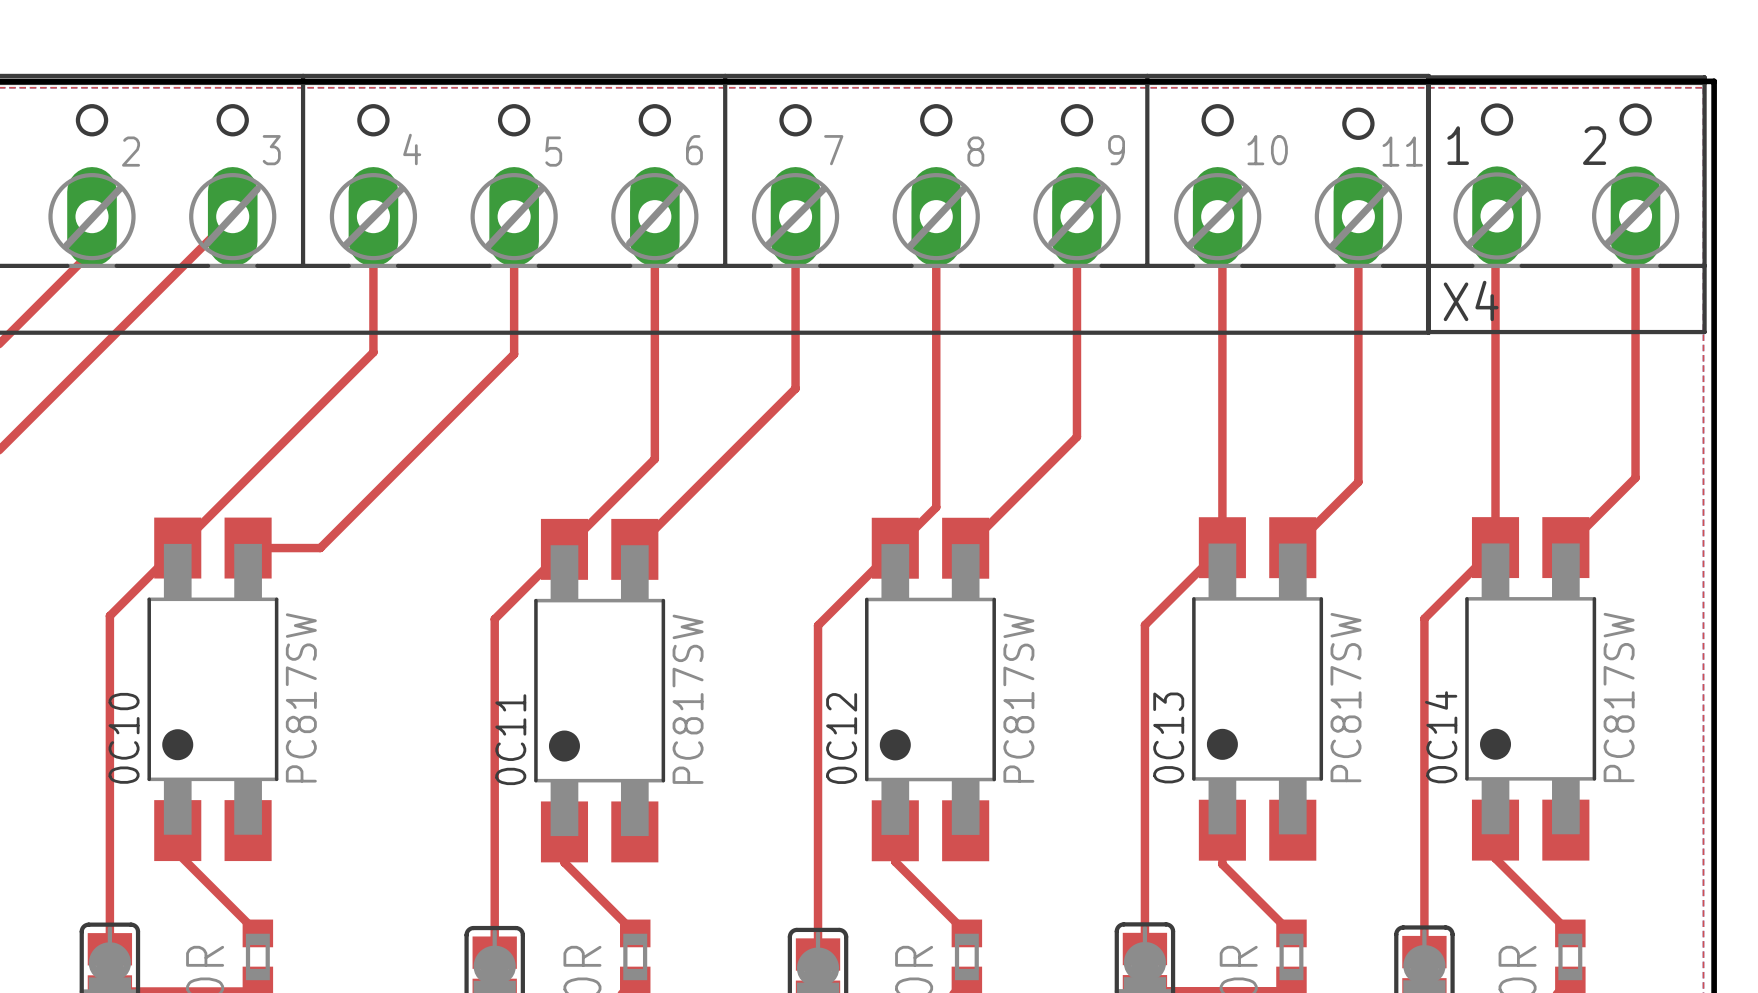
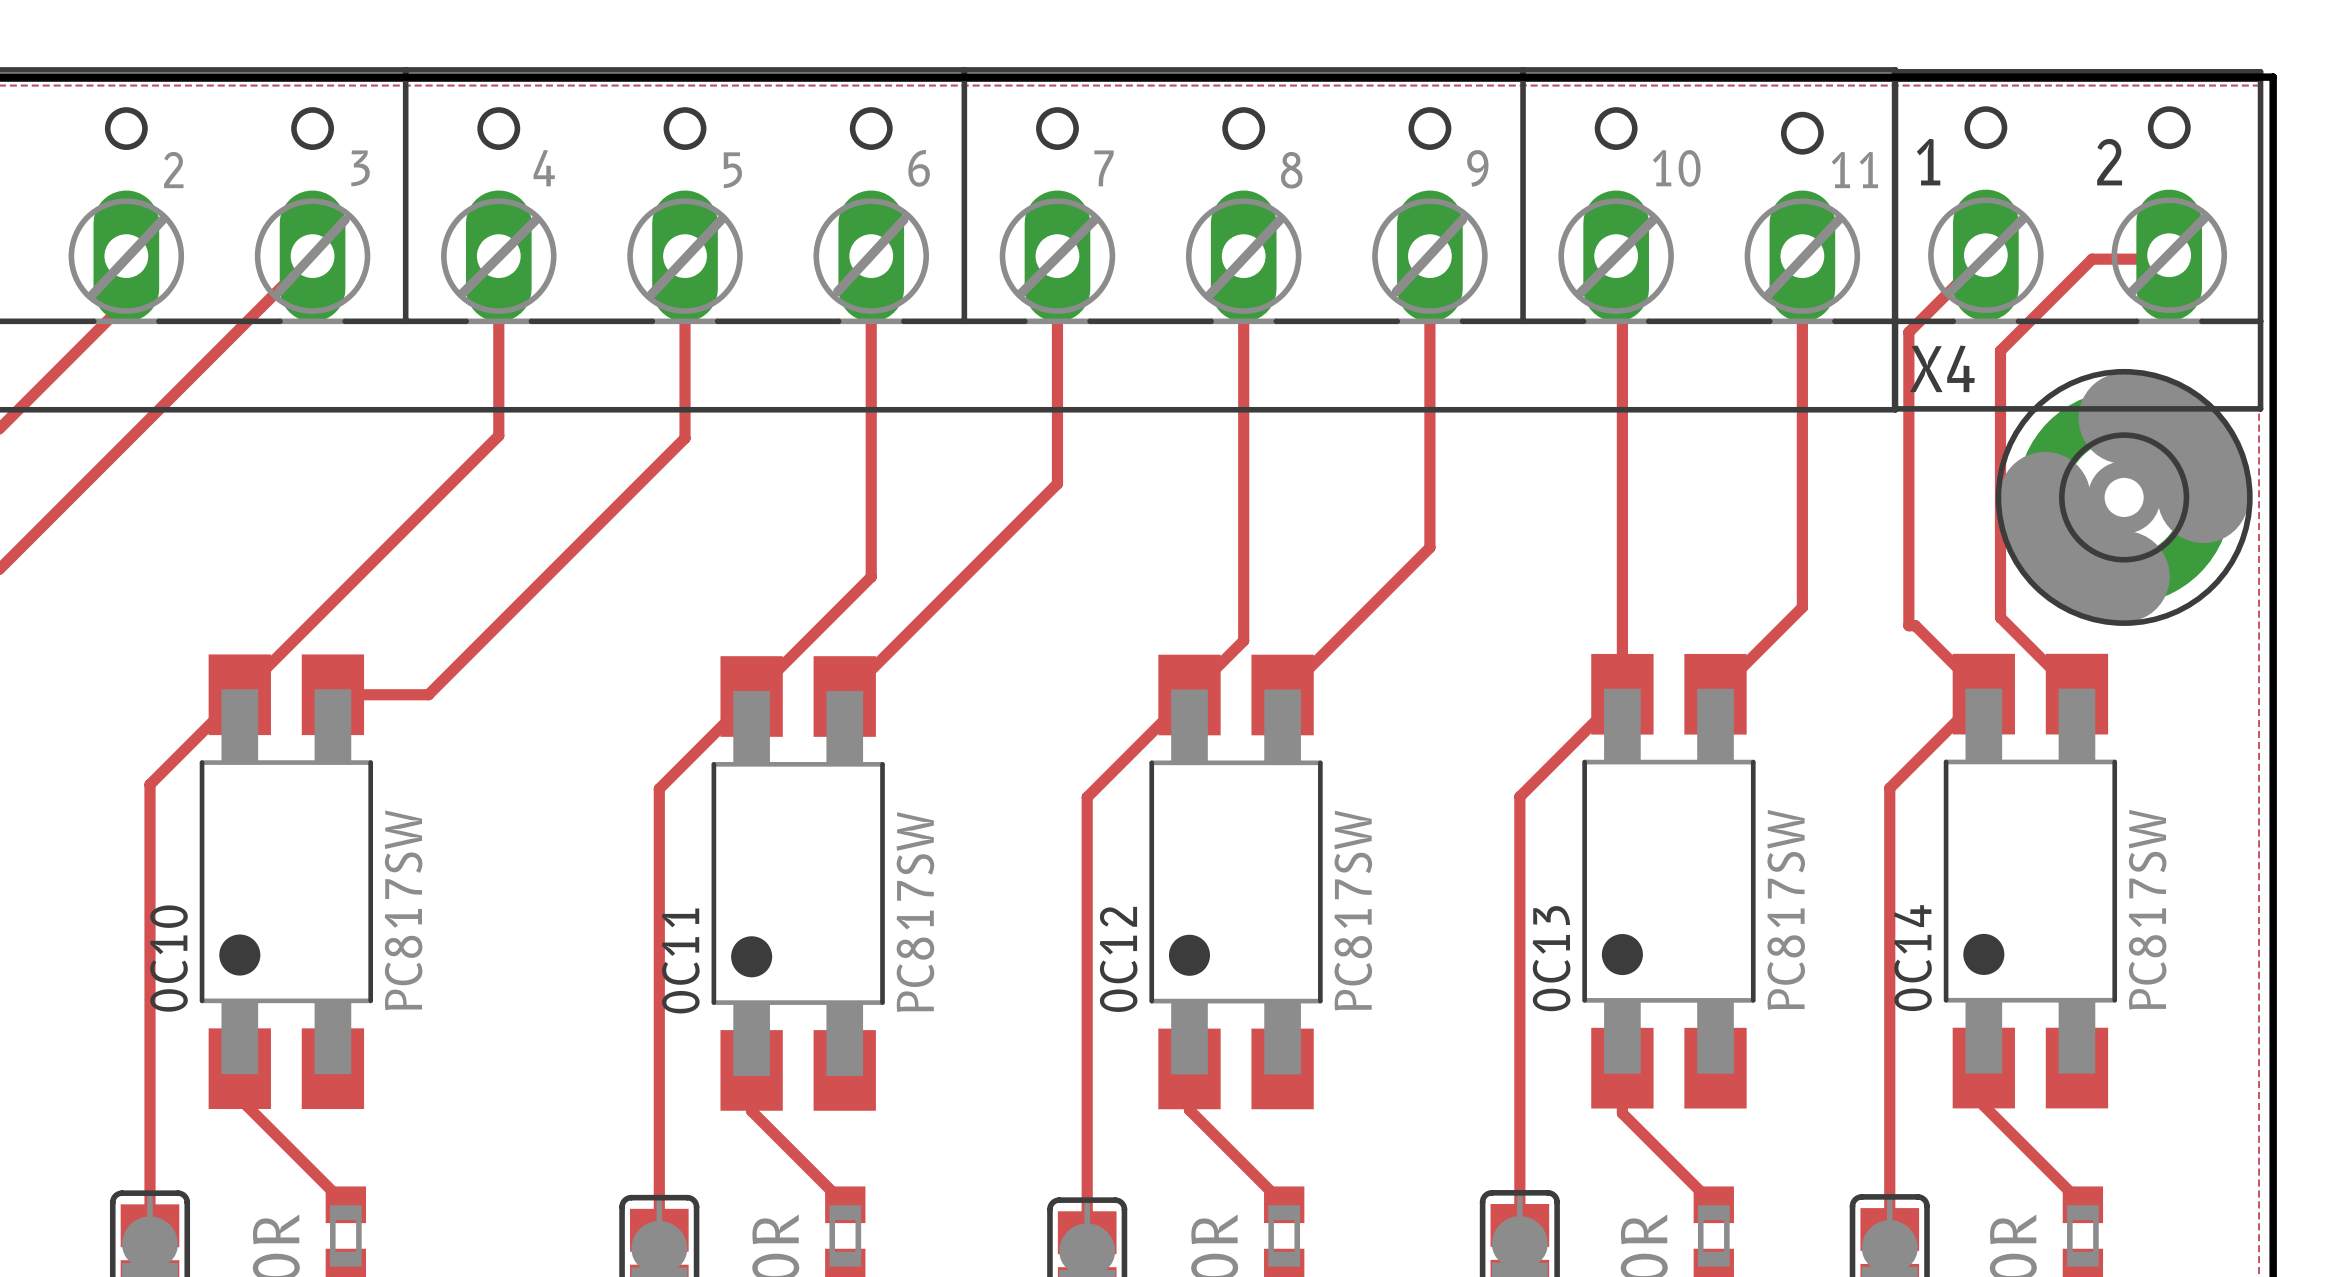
top track: (1495, 217) (1495, 547) -> (1983, 257) (1908, 332) (1908, 625) (1915, 625) (1983, 694)
top track: (1635, 218) (1635, 477) (1565, 547) -> (2169, 259) (2092, 259) (2000, 350) (2000, 617) (2076, 694)
part: none -> (2124, 497)

